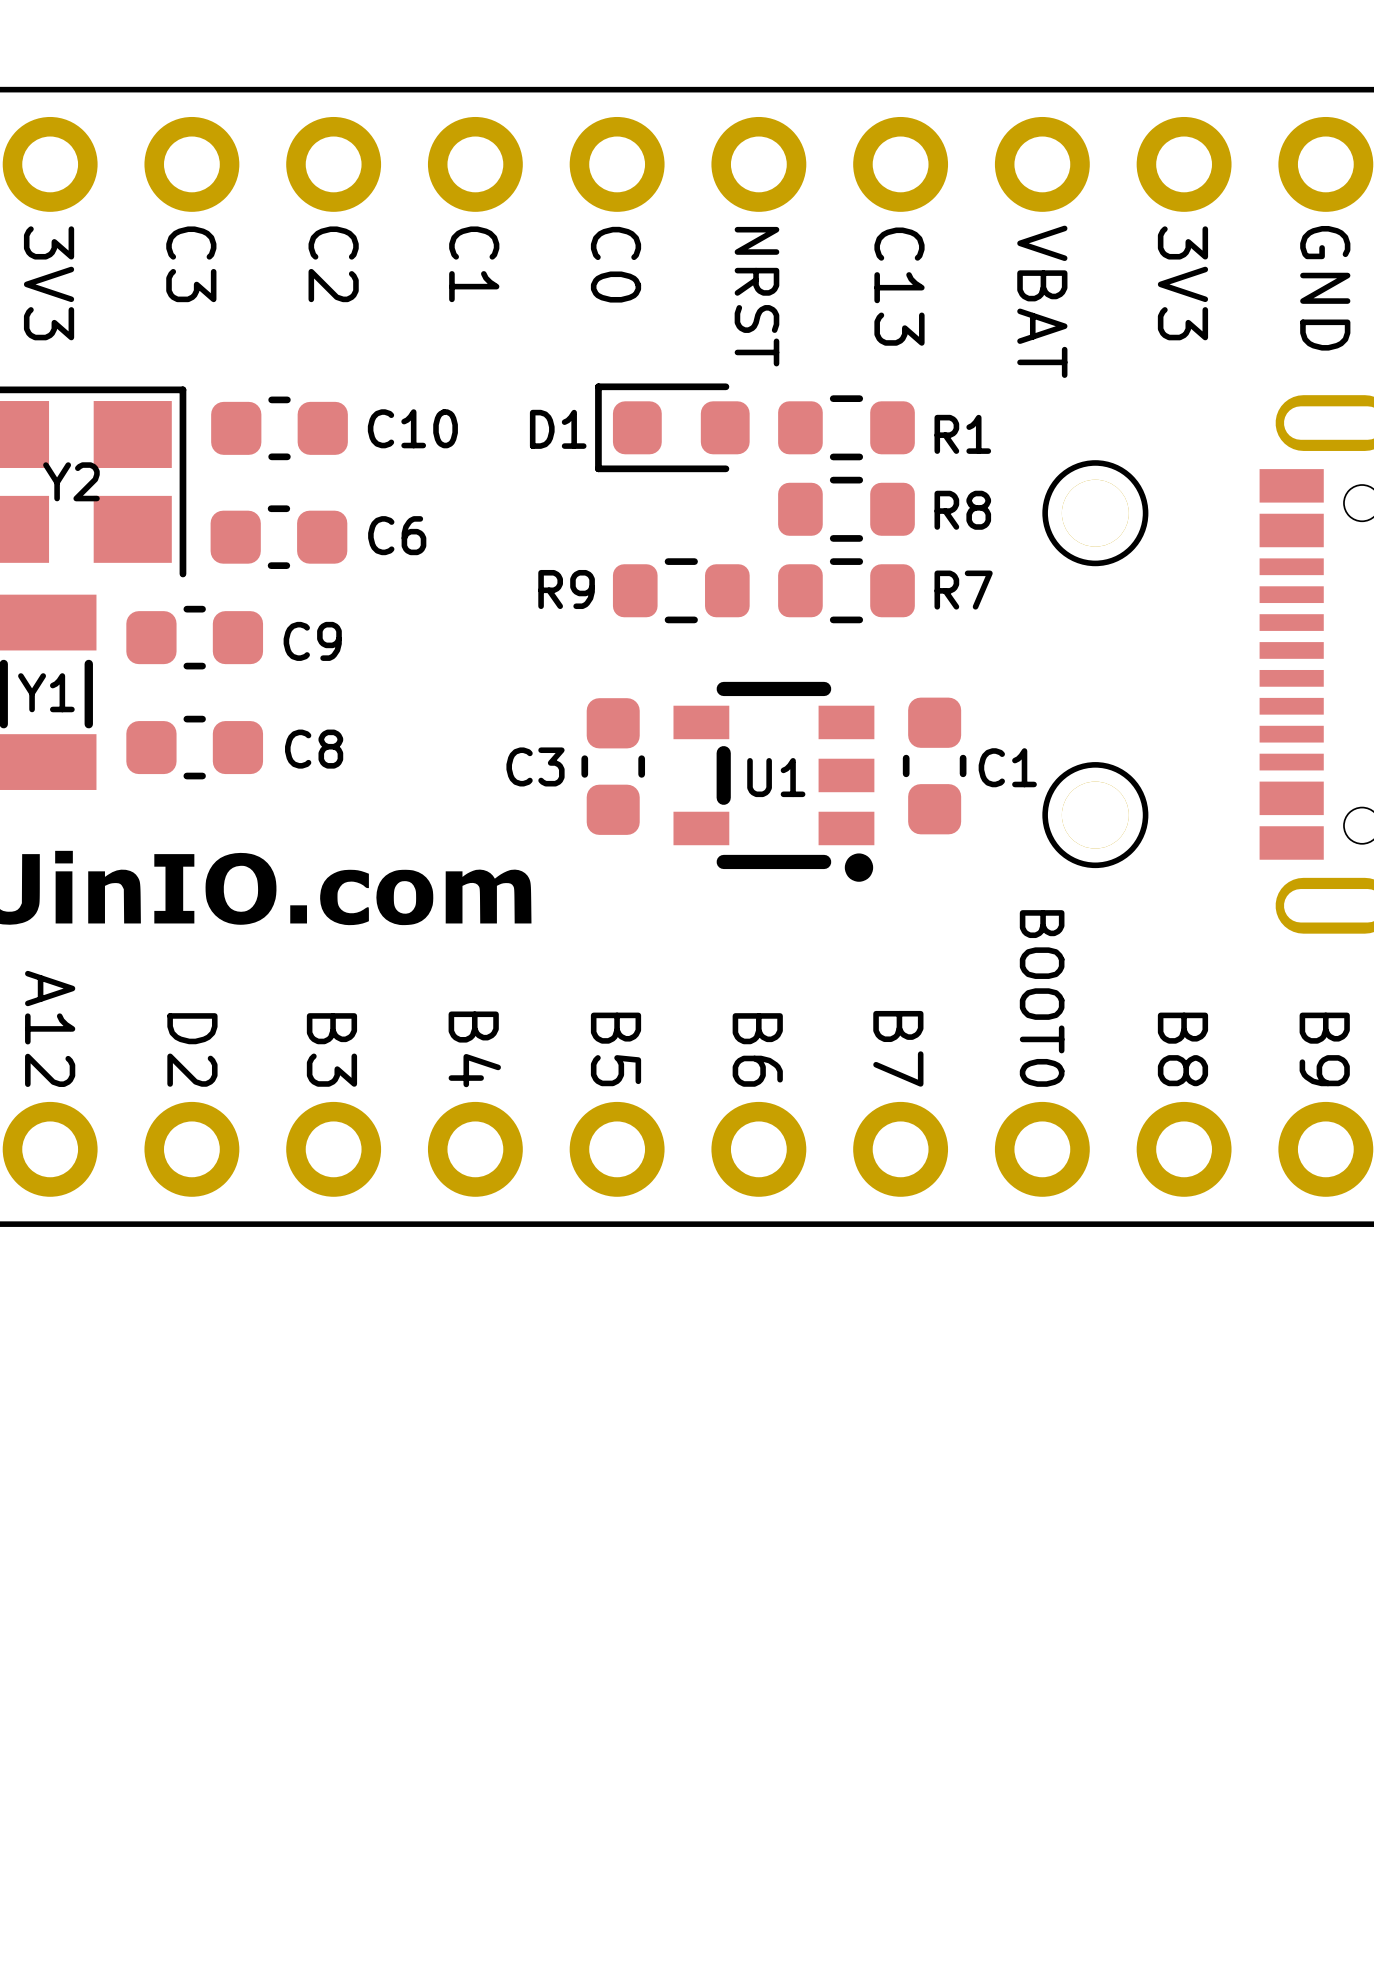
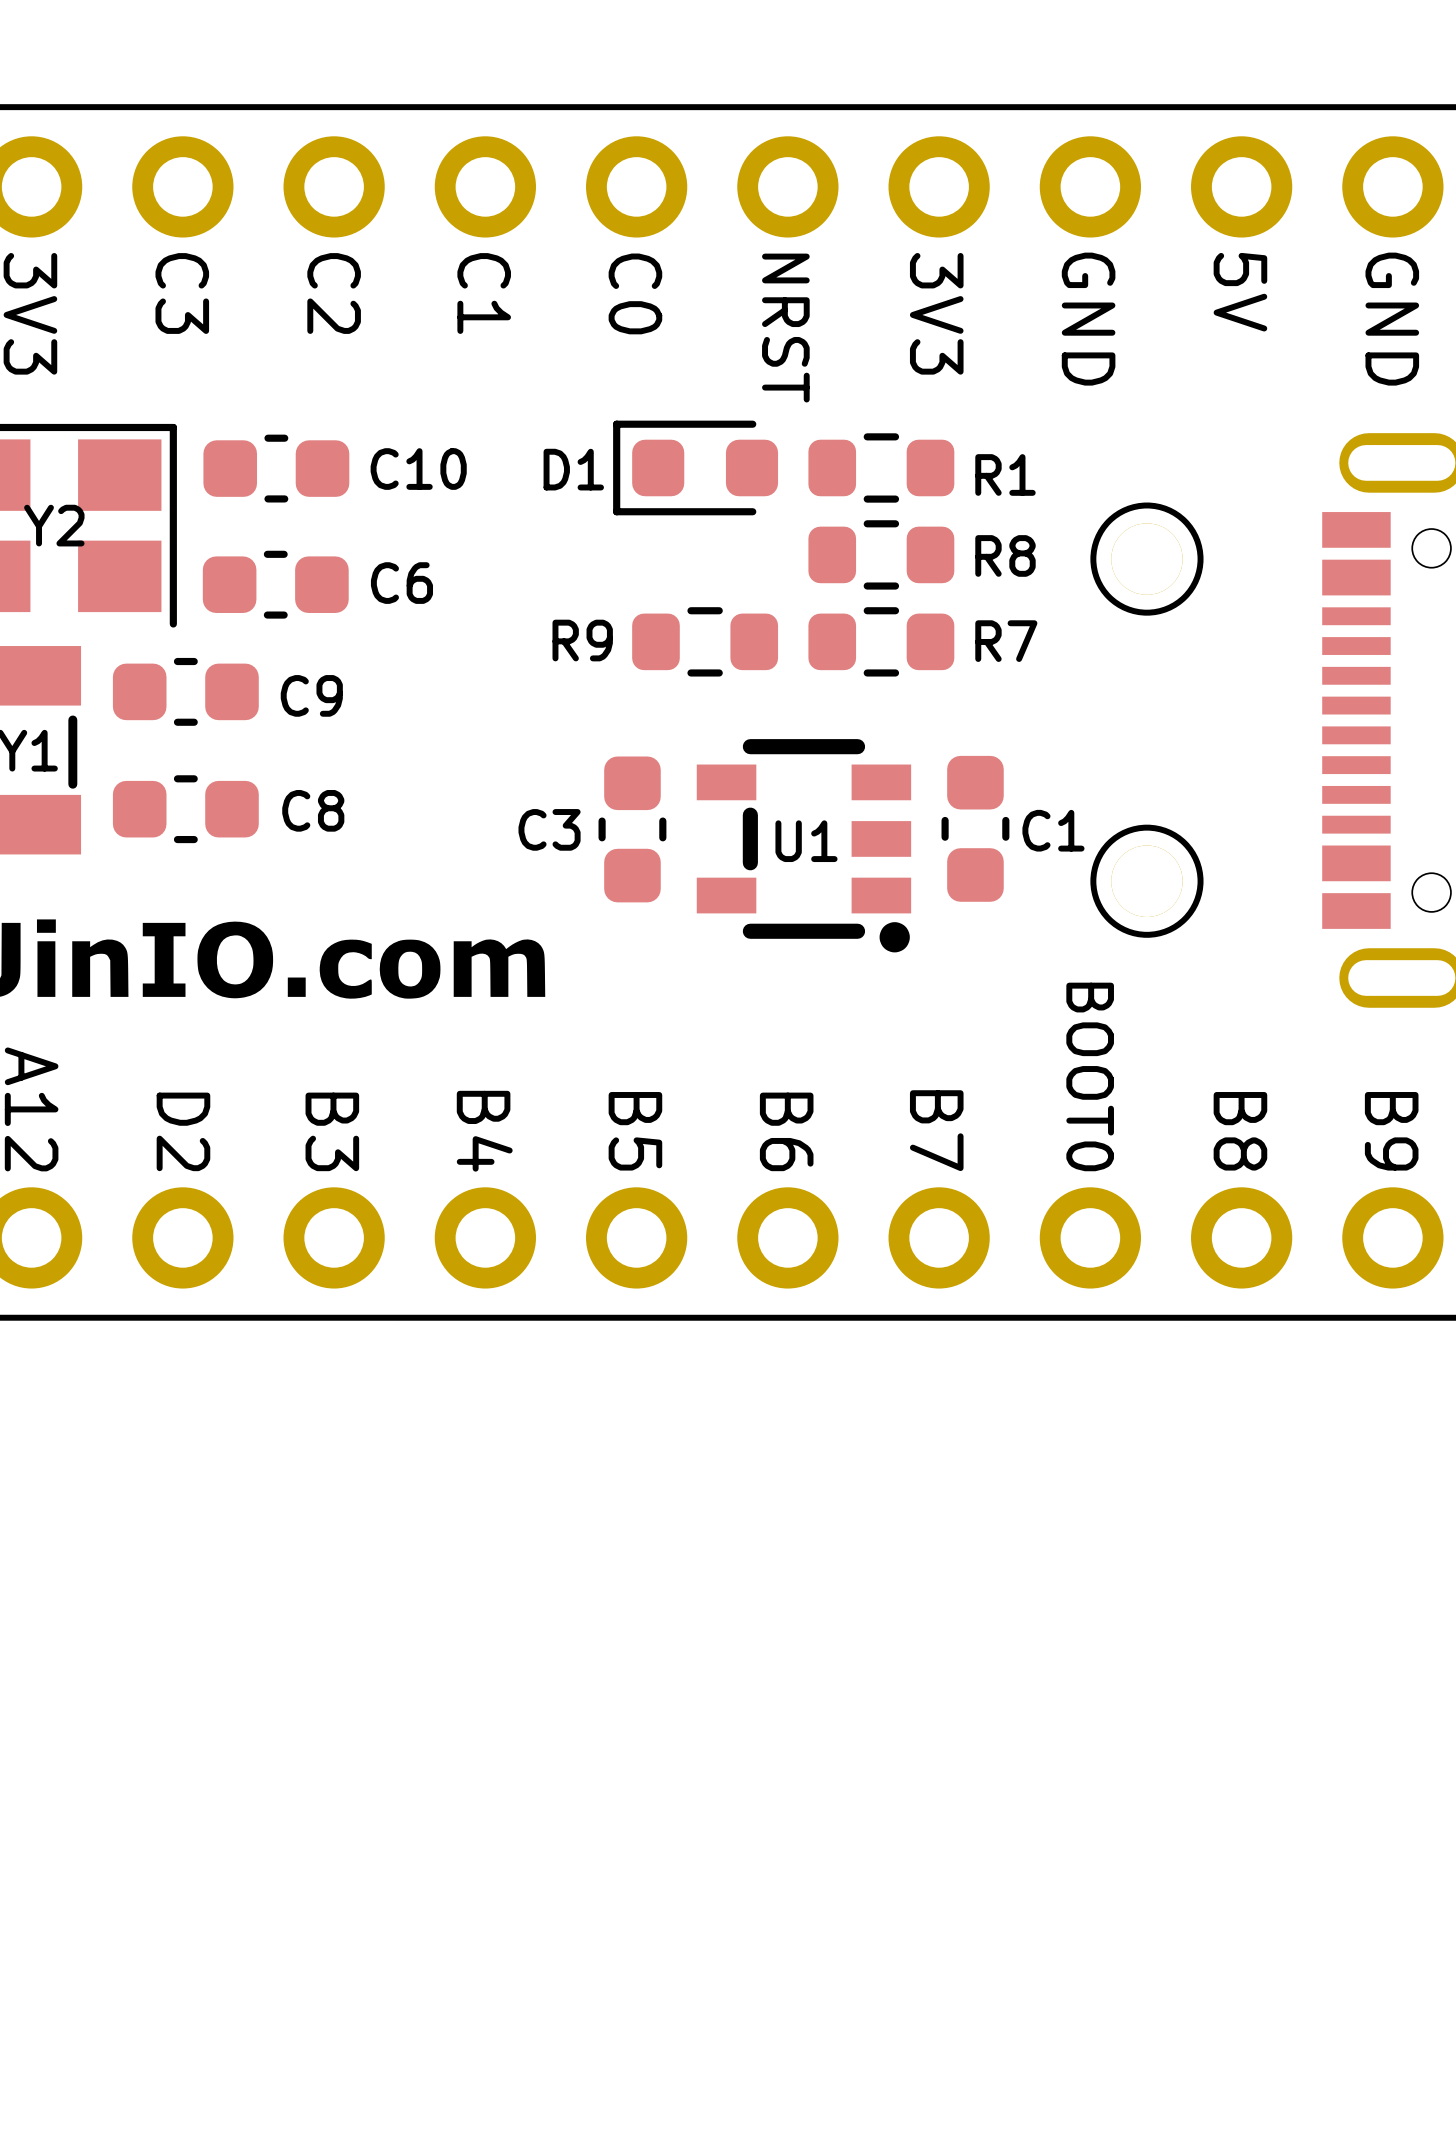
text: 3V3 (1182, 283) -> 5V (1240, 292)
text: C13 (899, 286) -> 3V3 (936, 313)
text: VBAT (1042, 301) -> GND (1088, 319)

